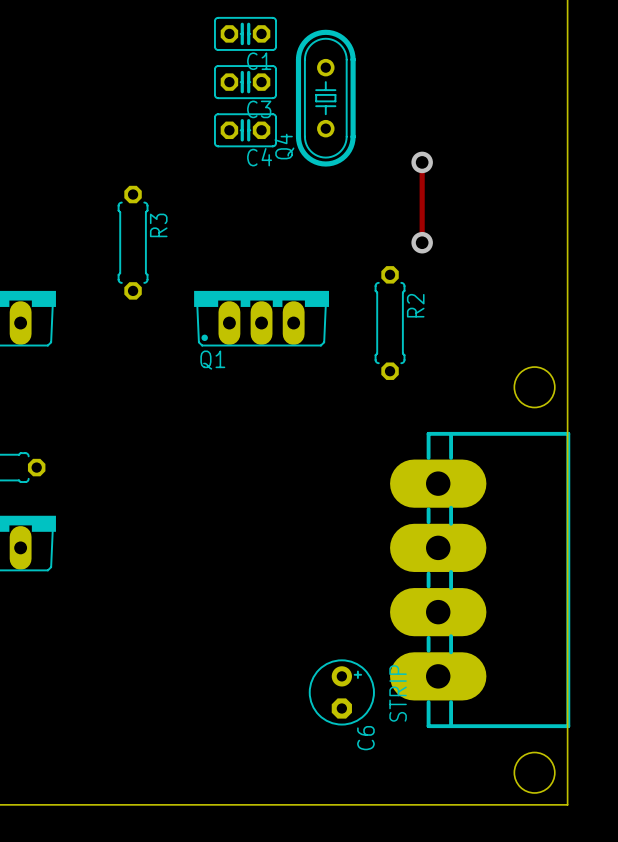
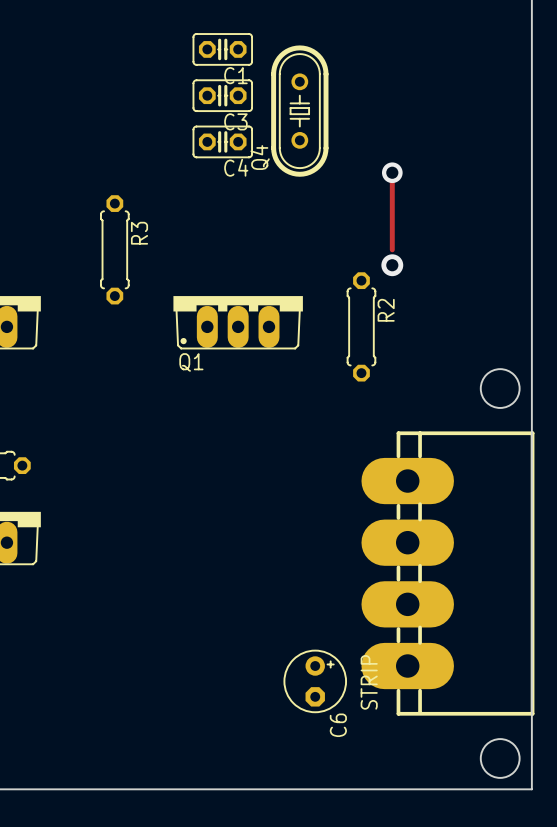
via: (422, 242) -> none
via: none -> (392, 265)

